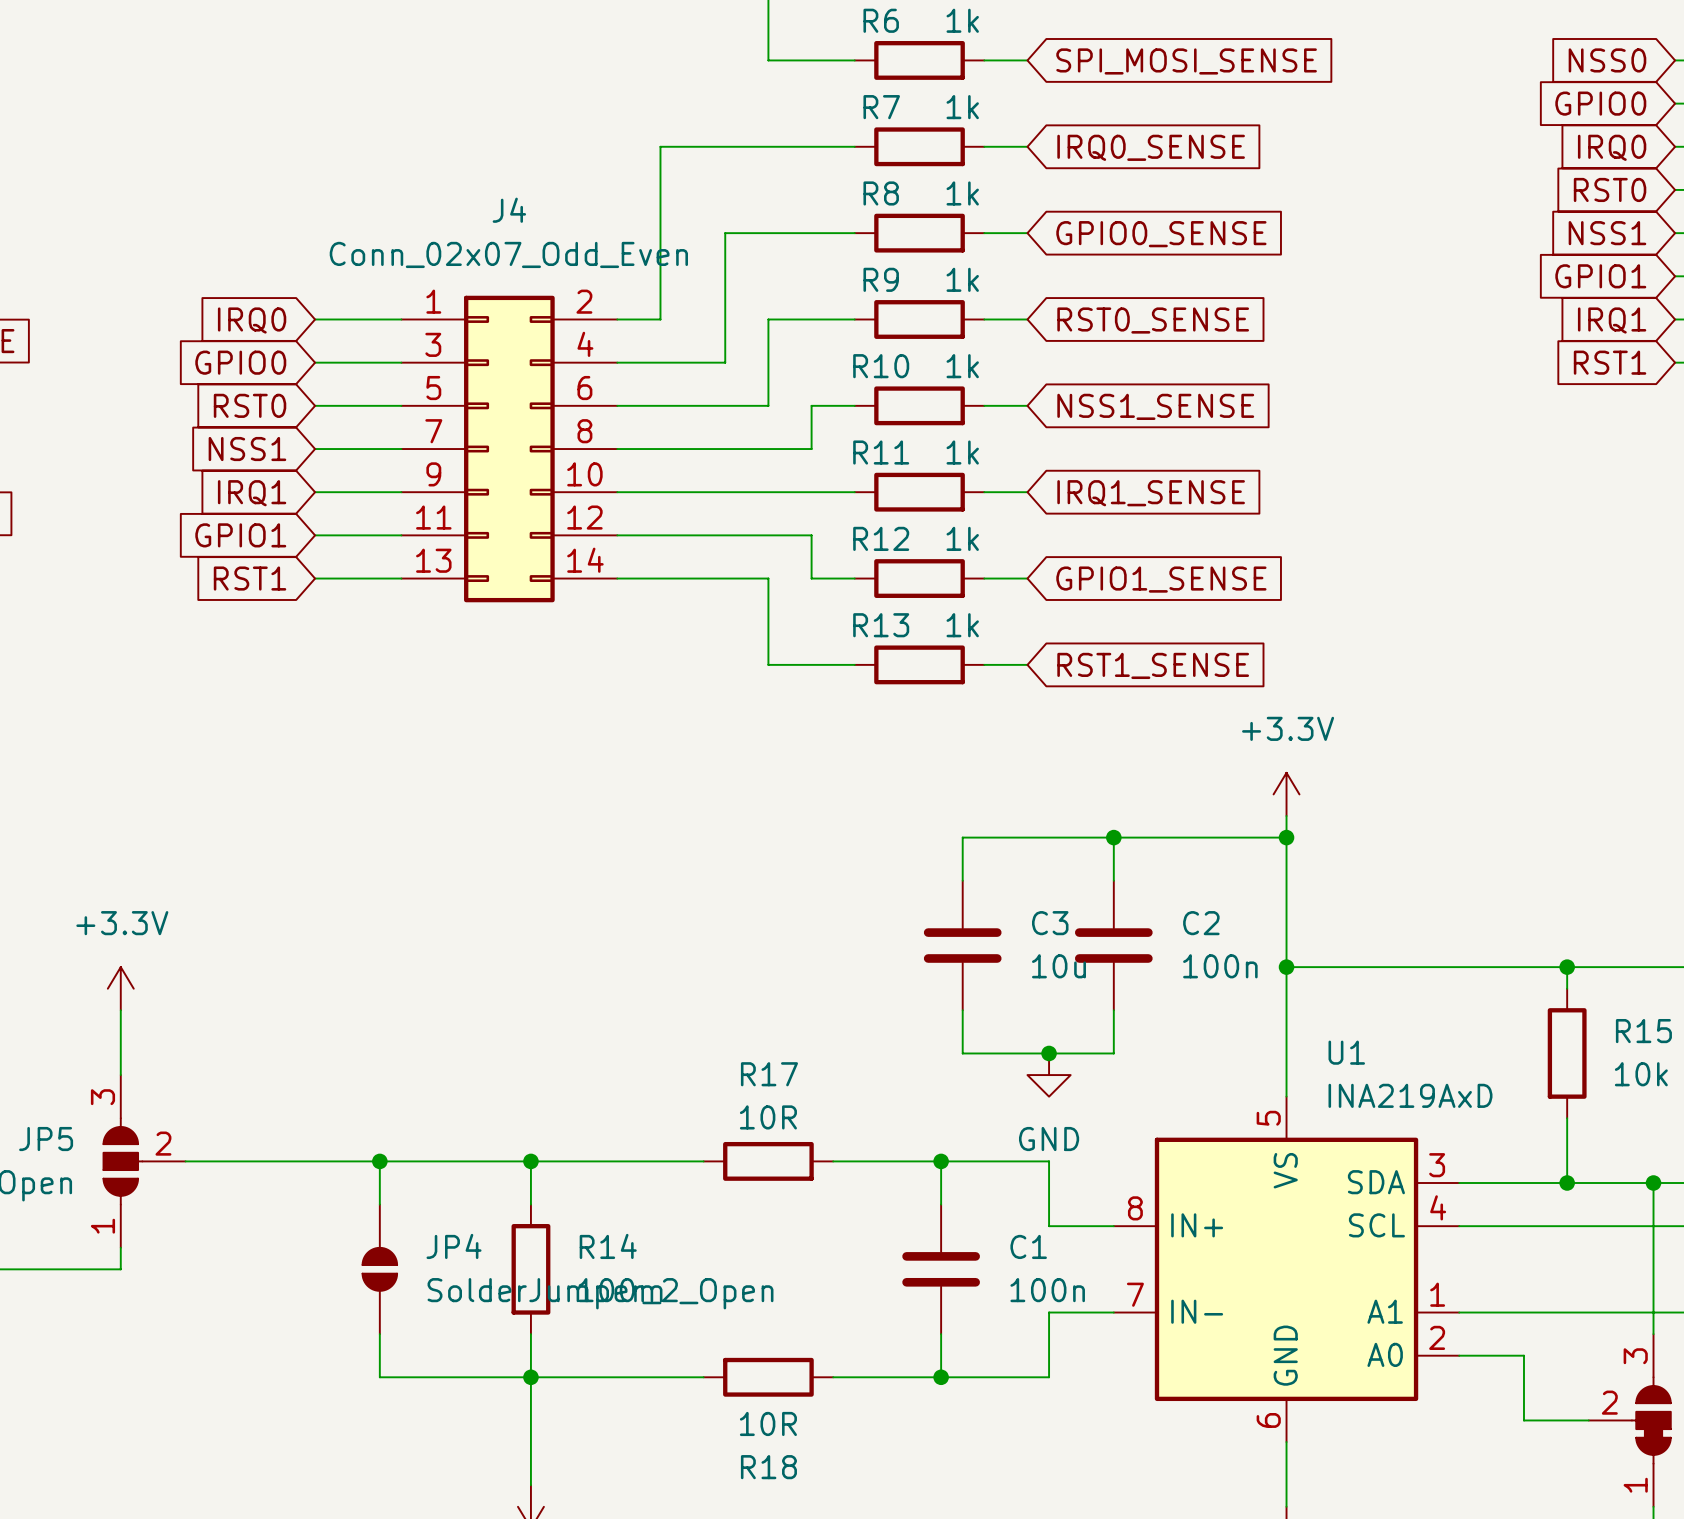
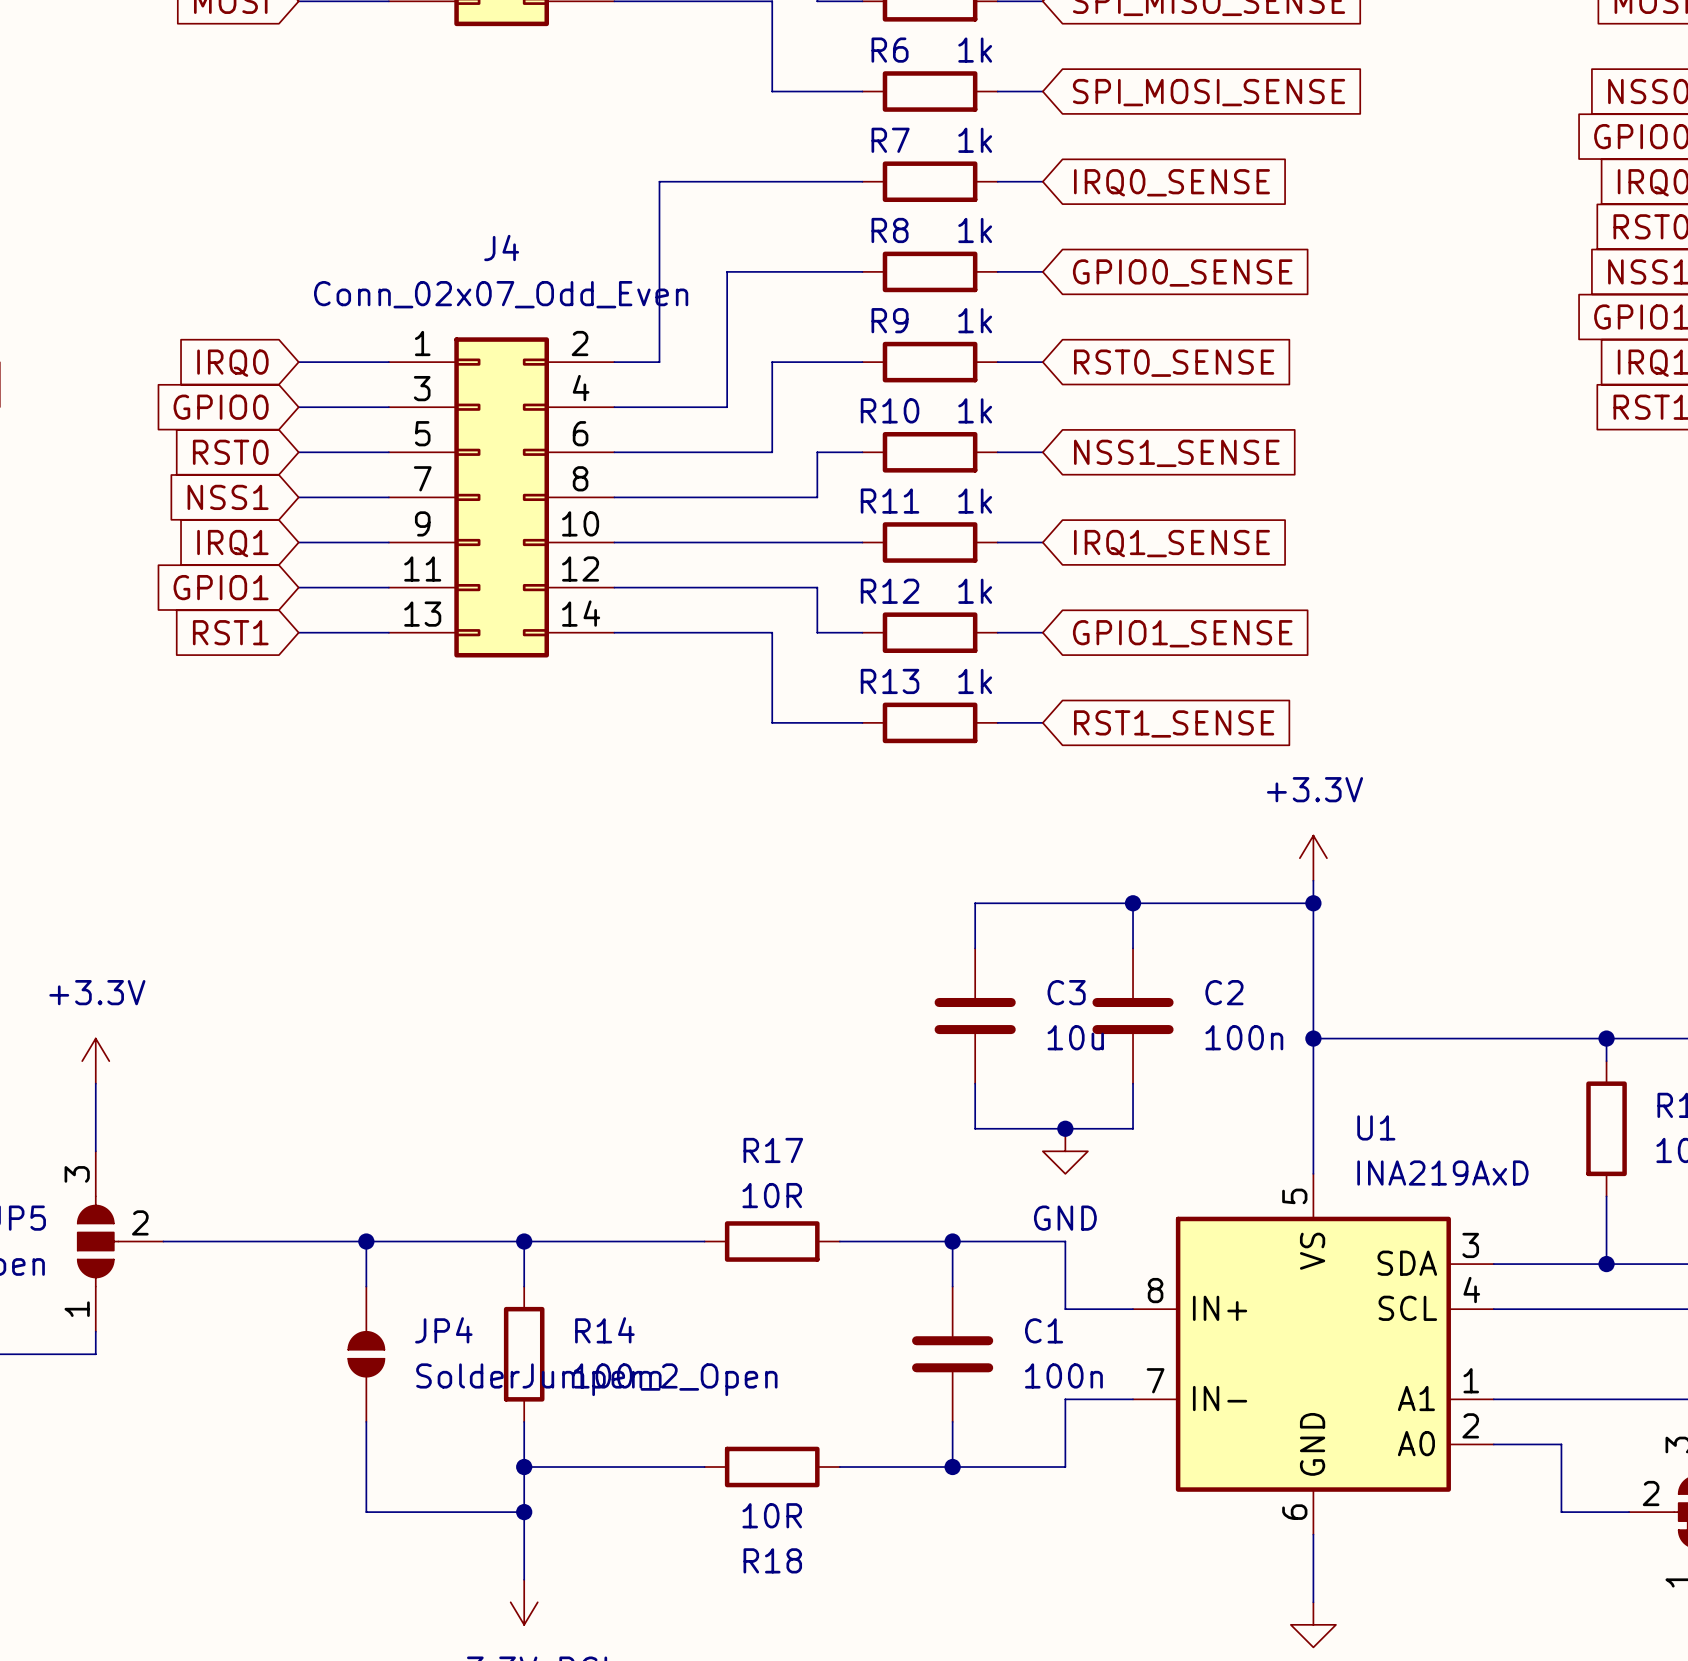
wire: (379, 1377) (530, 1377) -> (366, 1467) (366, 1512) (524, 1512)
junction: none -> (524, 1512)

